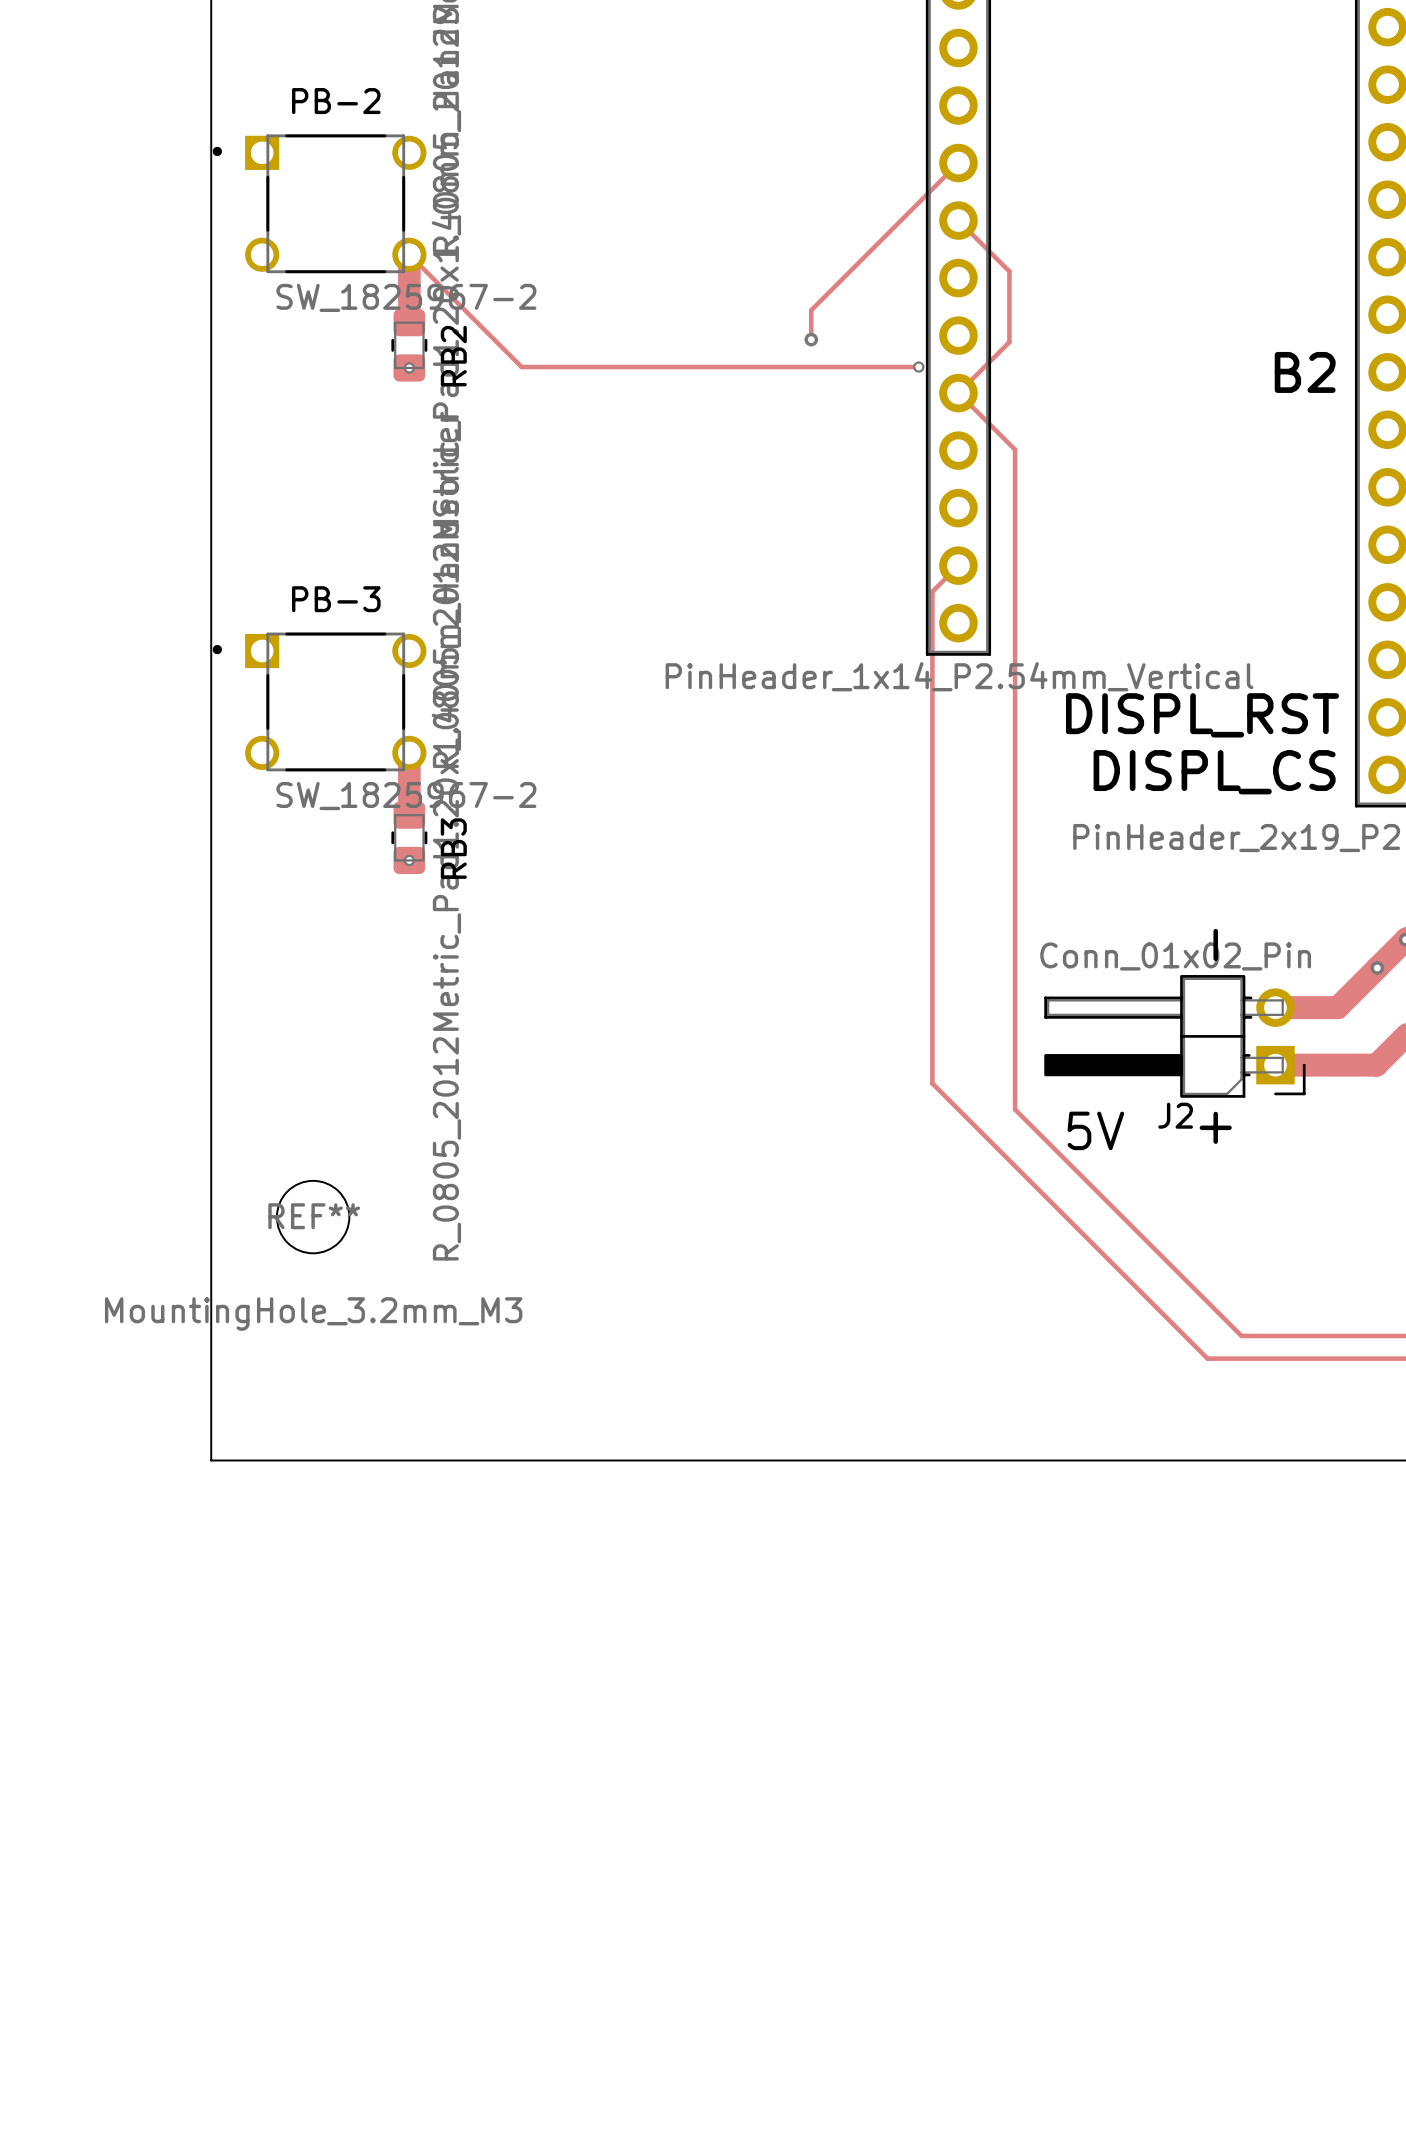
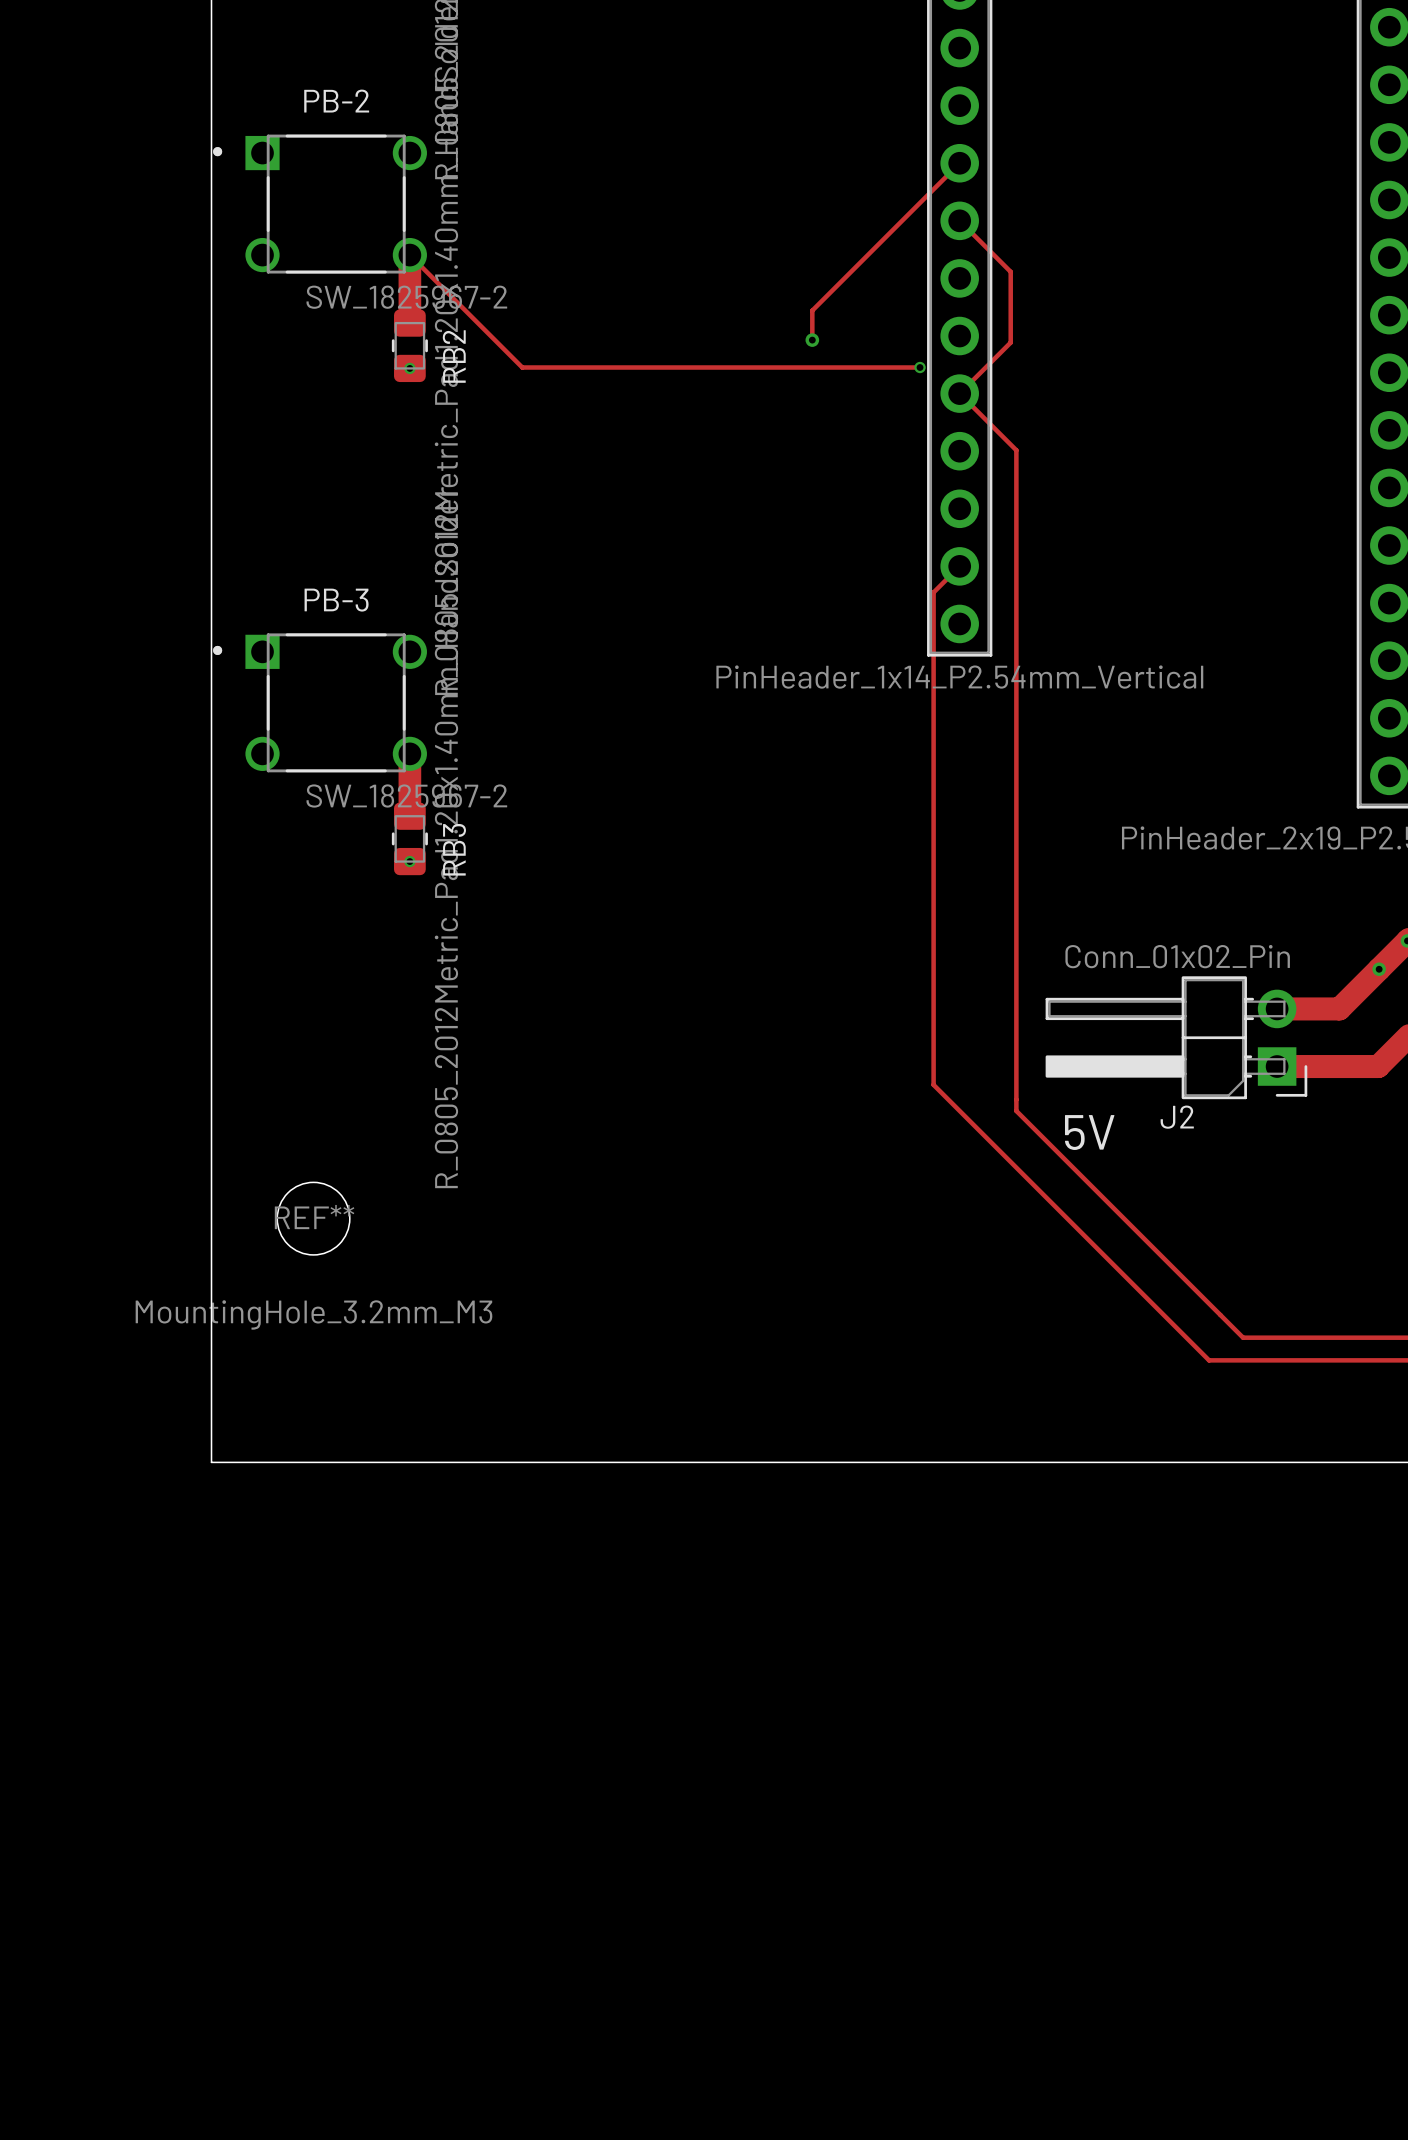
text: B2 (1305, 372) -> none
text: DISPL_RST (1202, 715) -> none
text: DISPL_CS (1214, 772) -> none
text: + - (1215, 1036) -> none

